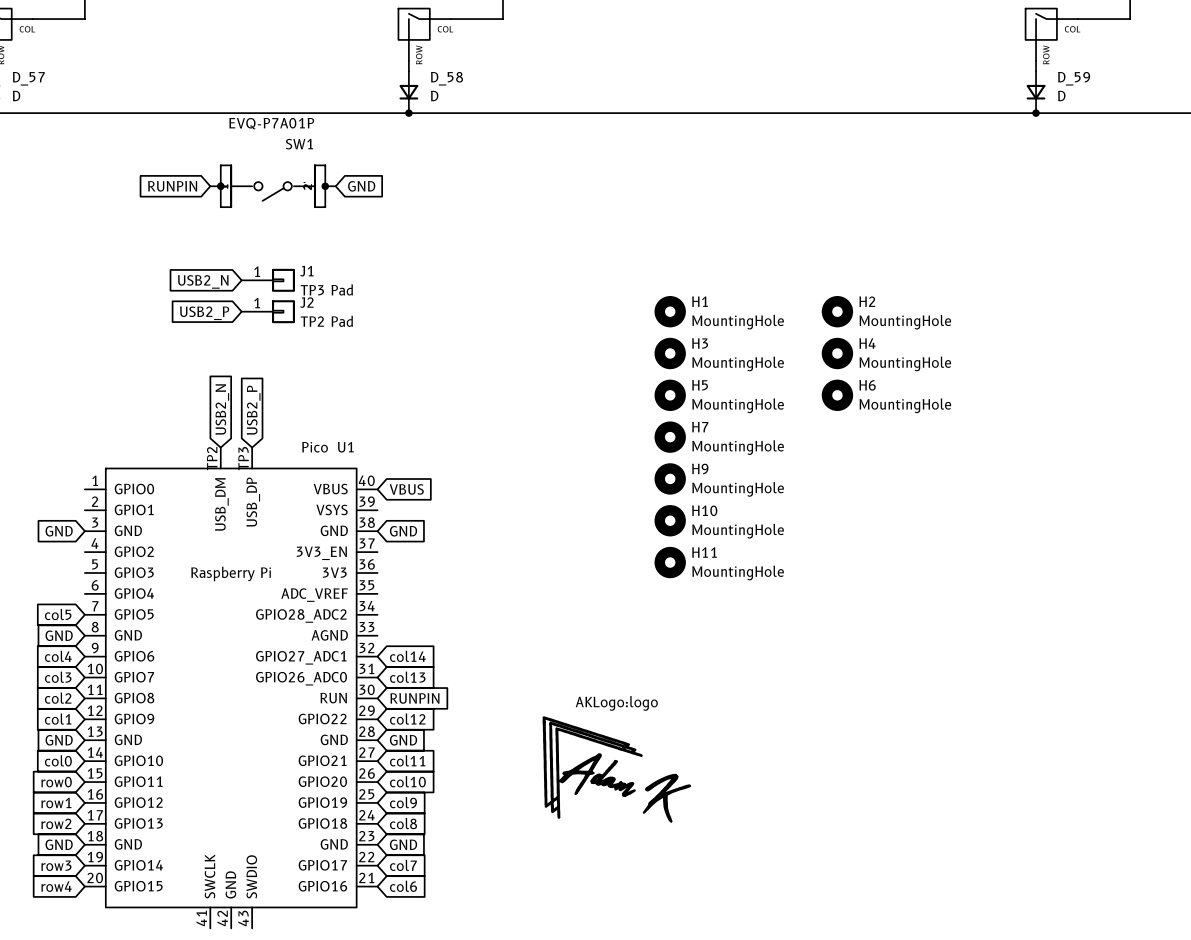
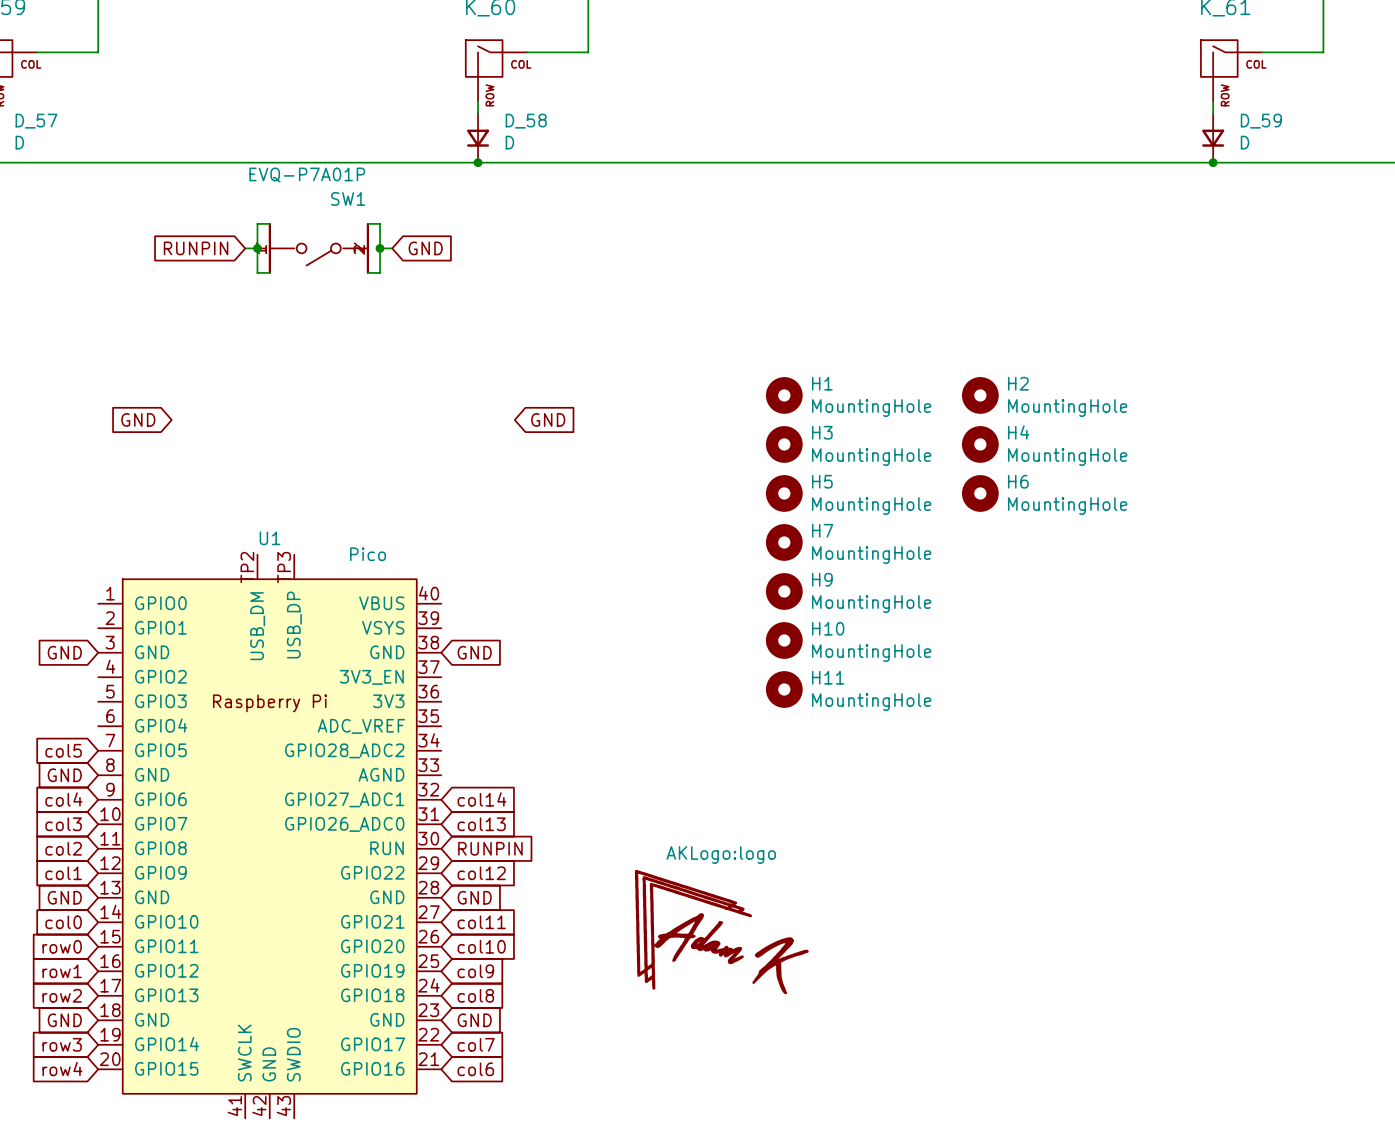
J1: TP3 Pad (268, 280) -> none
global label: USB2_N (203, 281) -> none
J2: TP2 Pad (268, 311) -> none
global label: USB2_P (204, 313) -> none
global label: none -> GND (138, 419)
global label: none -> GND (548, 419)
global label: USB2_N (222, 409) -> none
global label: USB2_P (253, 410) -> none
U1 name position: U1 (345, 447) -> U1 (270, 538)
global label: VBUS (406, 489) -> none

